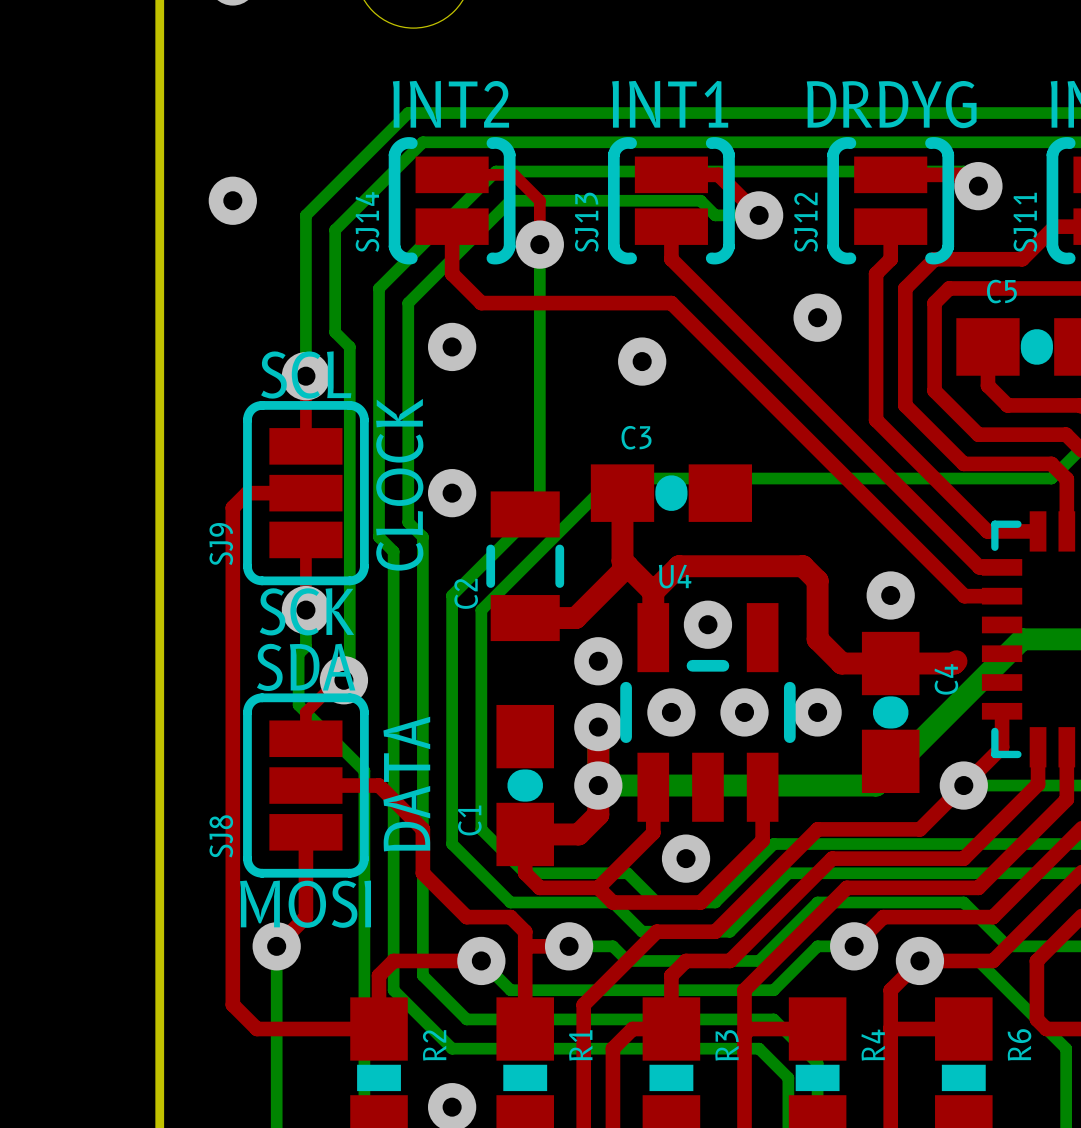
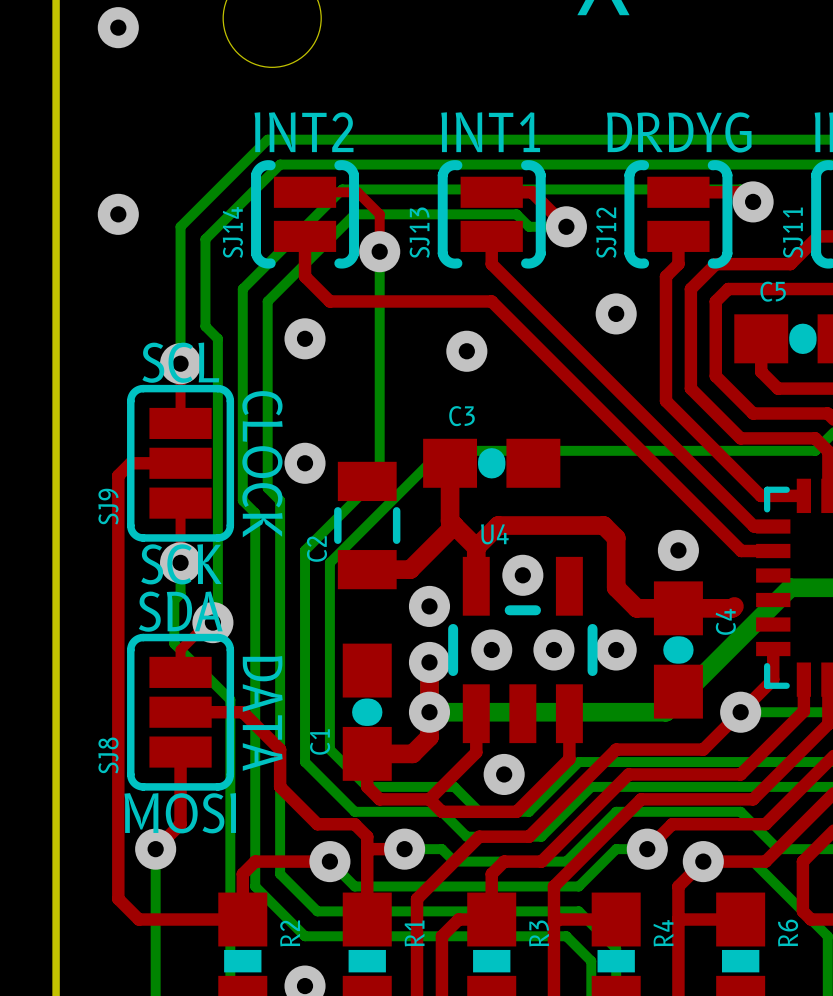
text rotation: 0° (399, 484) -> 180° (262, 464)
text rotation: 0° (406, 784) -> 180° (262, 713)

